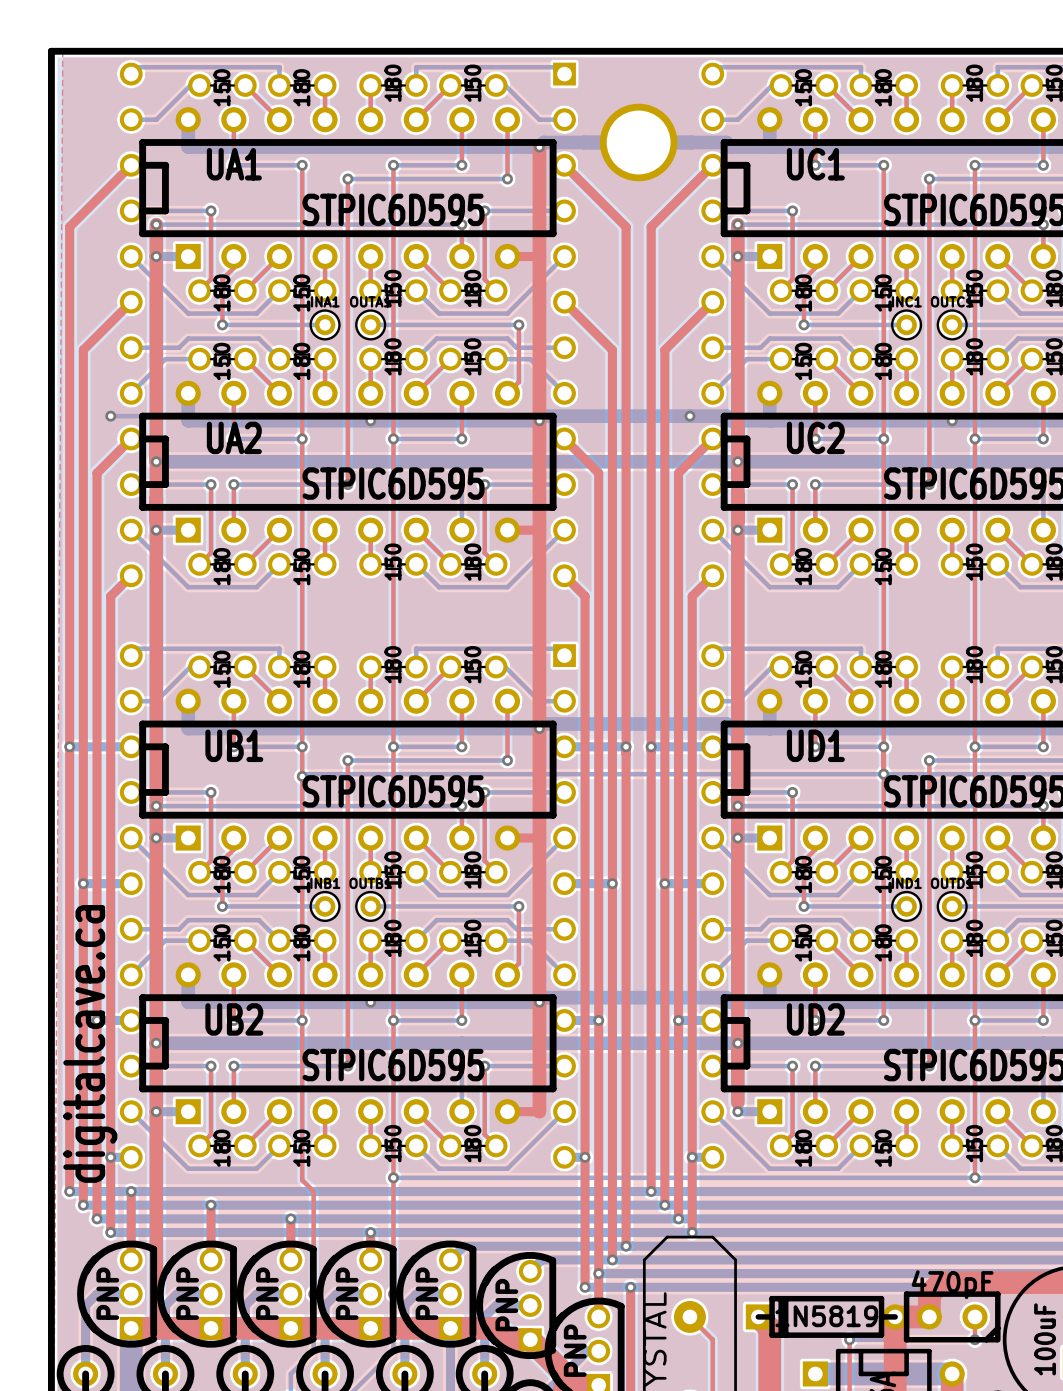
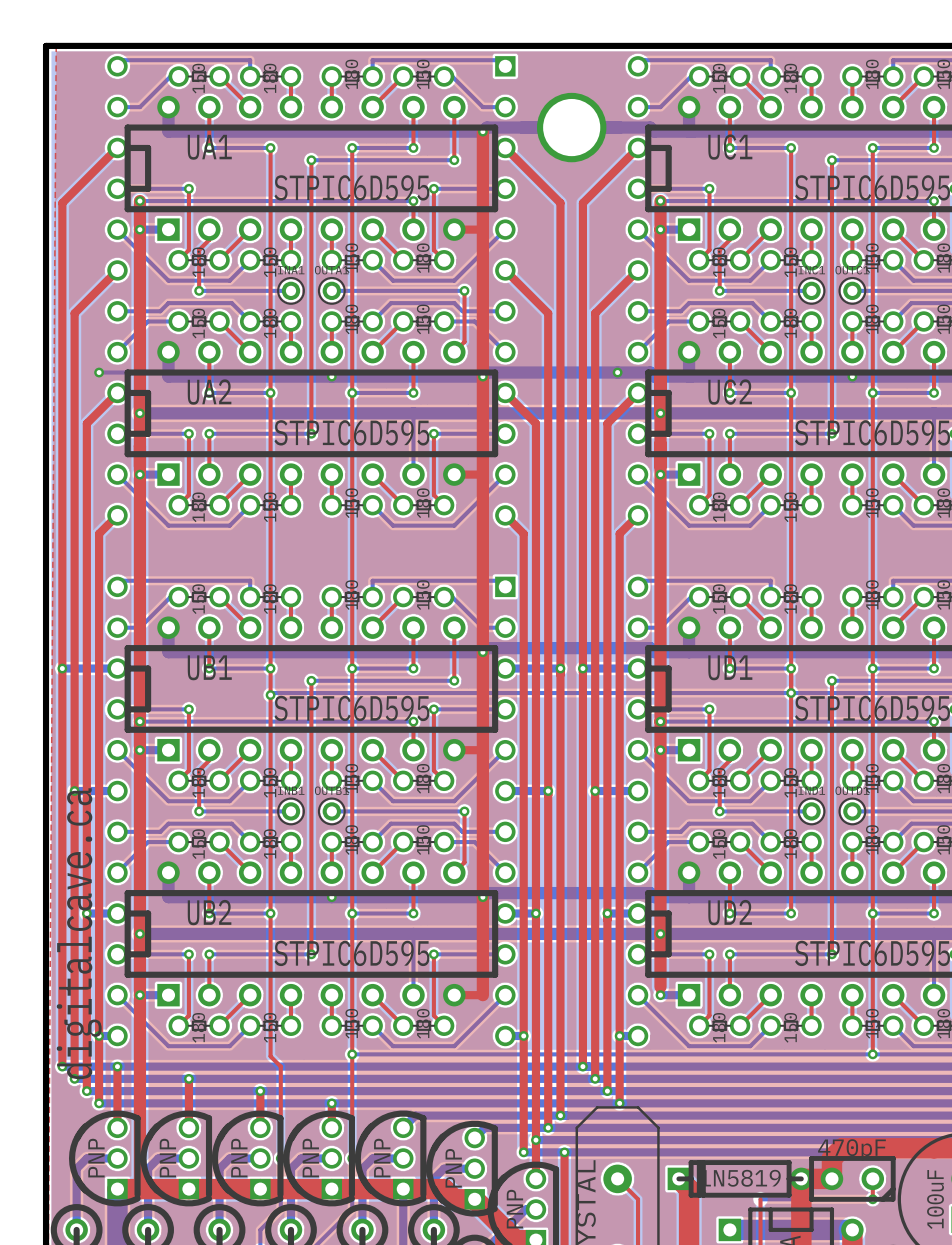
via: (849, 1339) -> none

